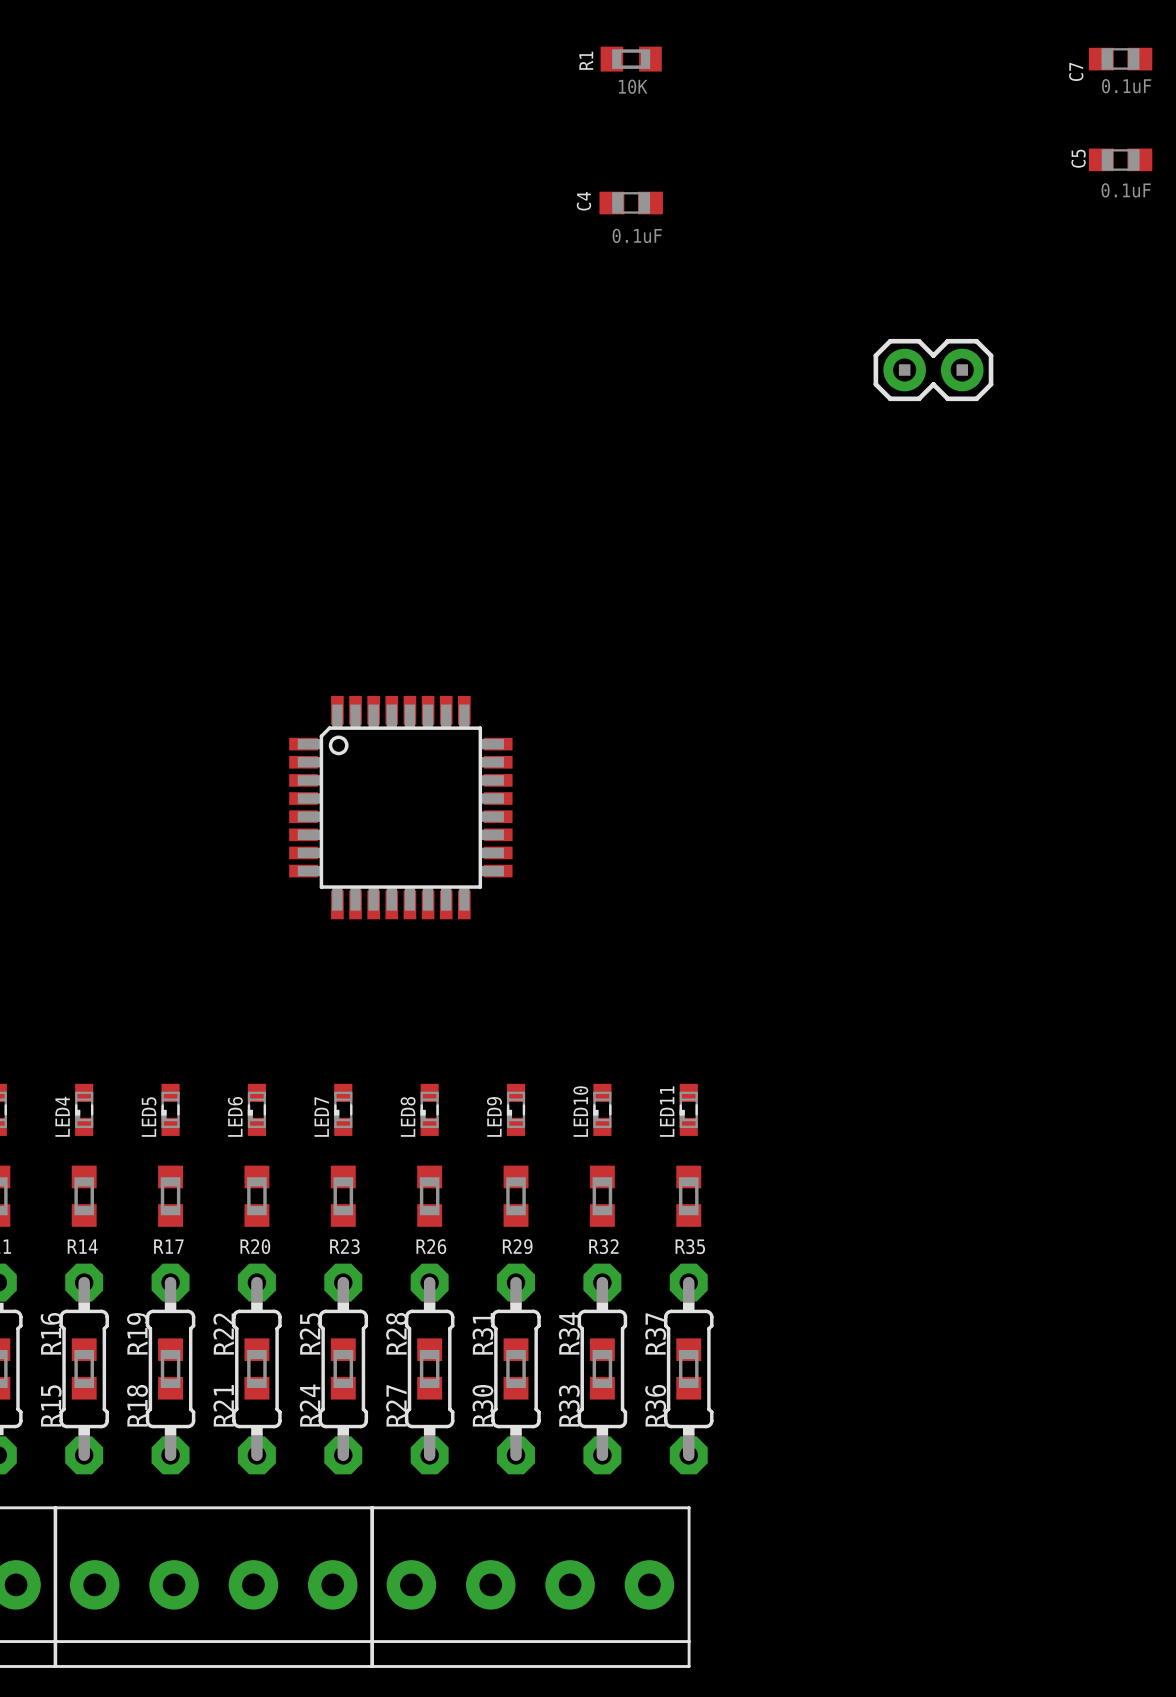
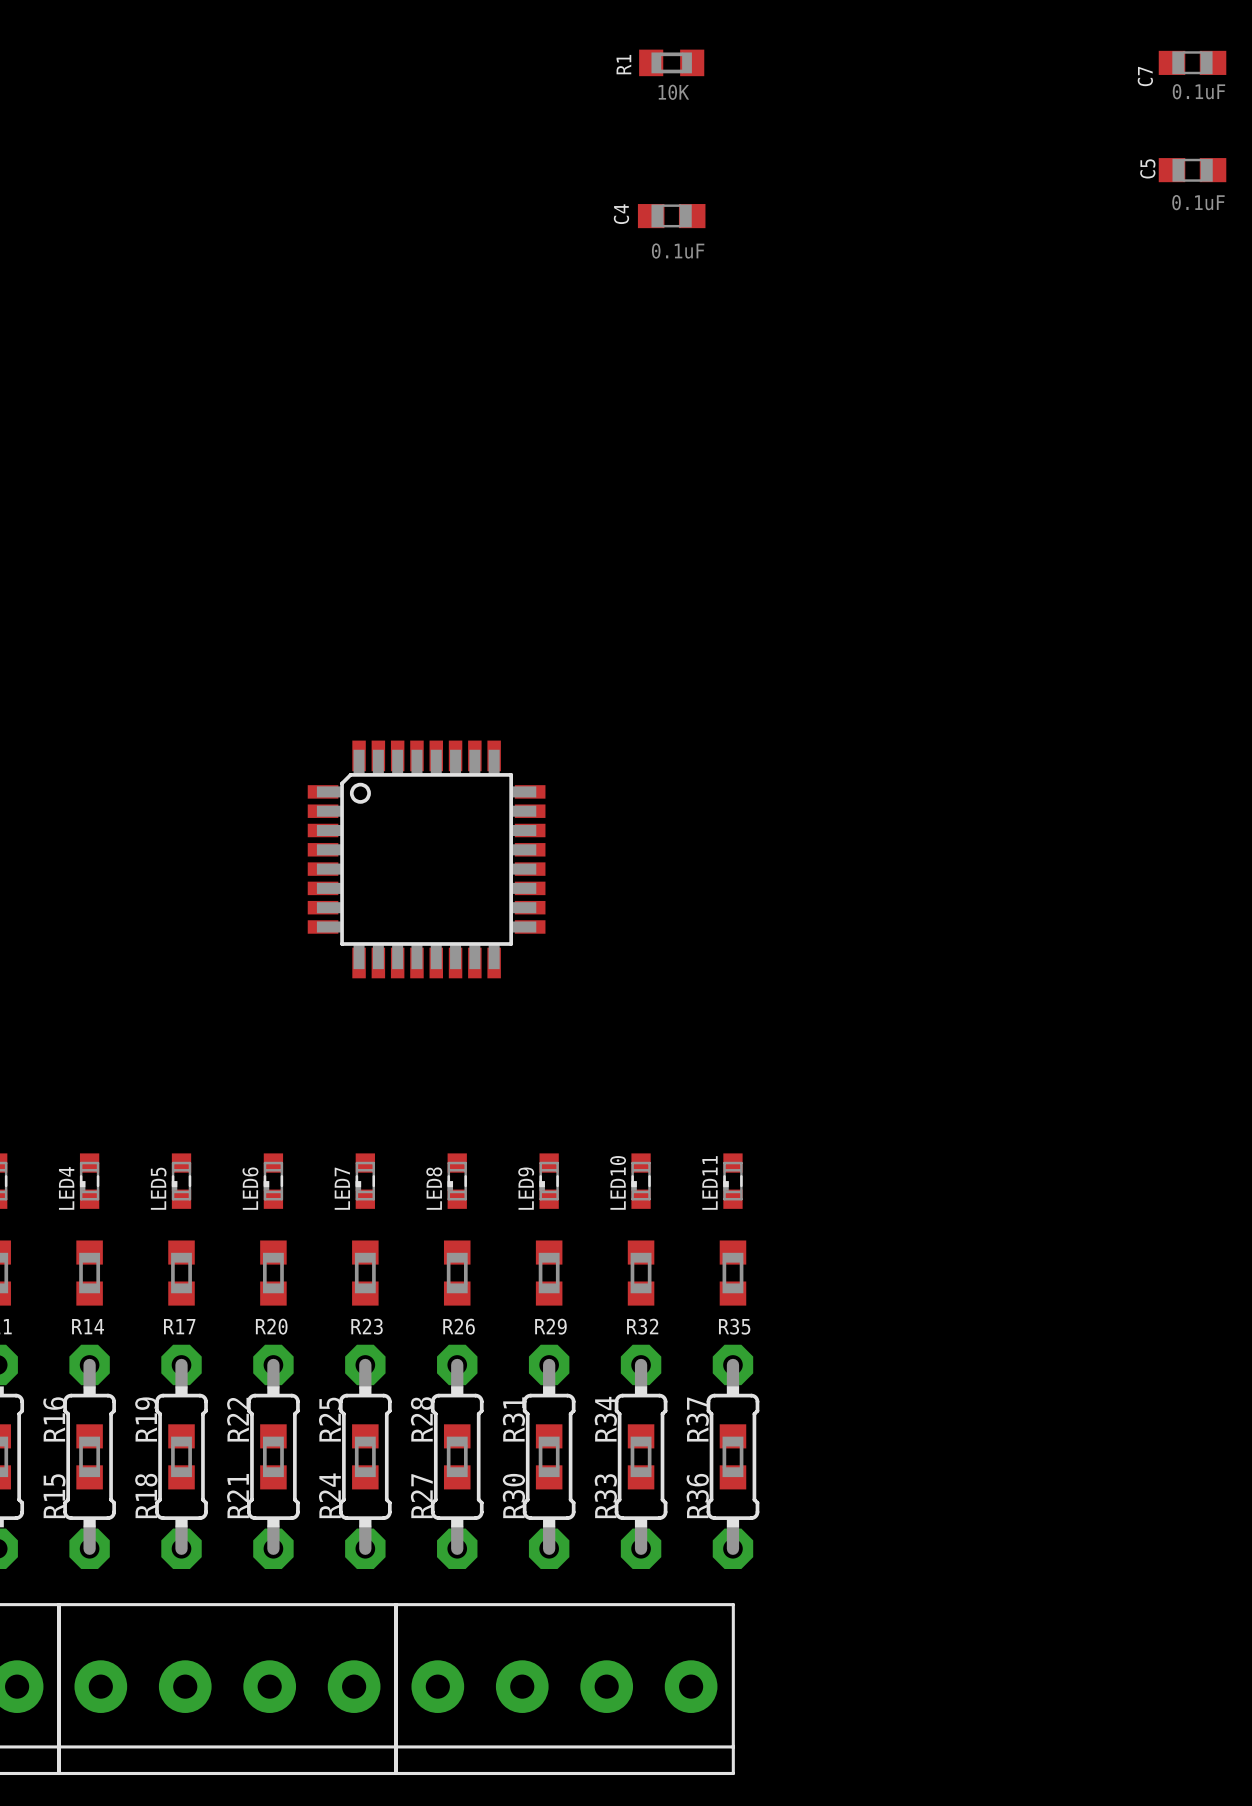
part: (933, 370) -> none

